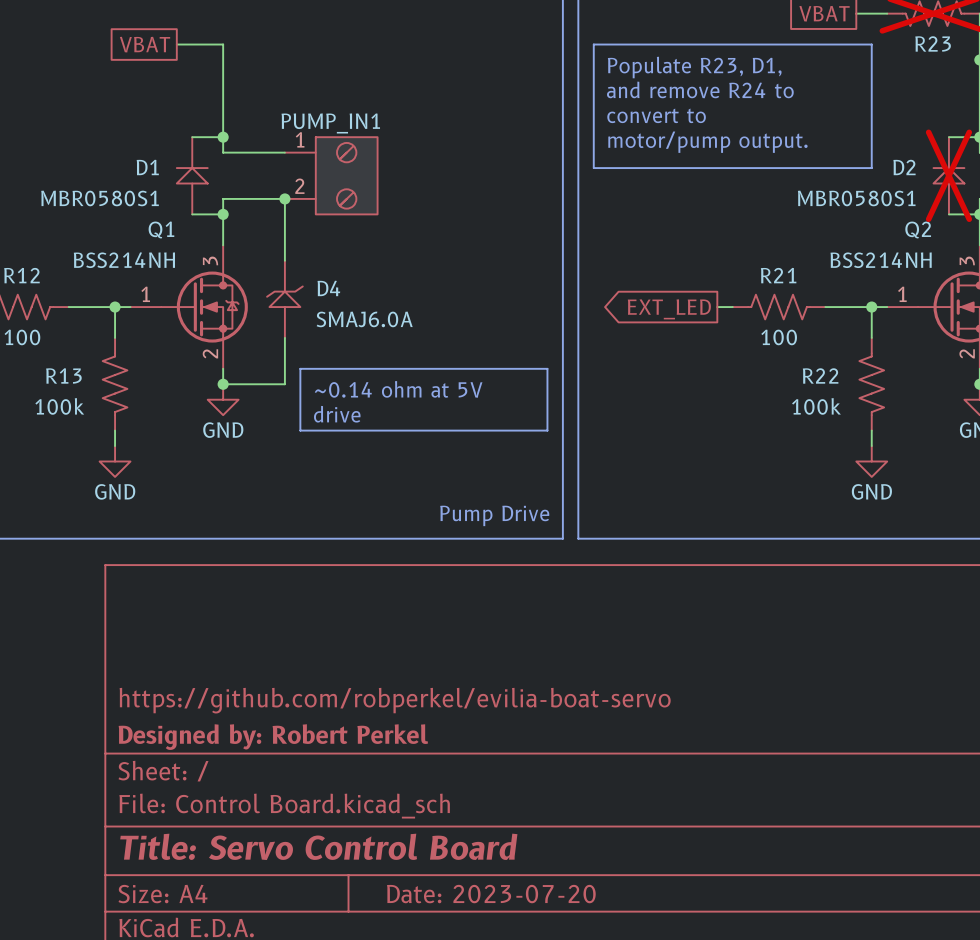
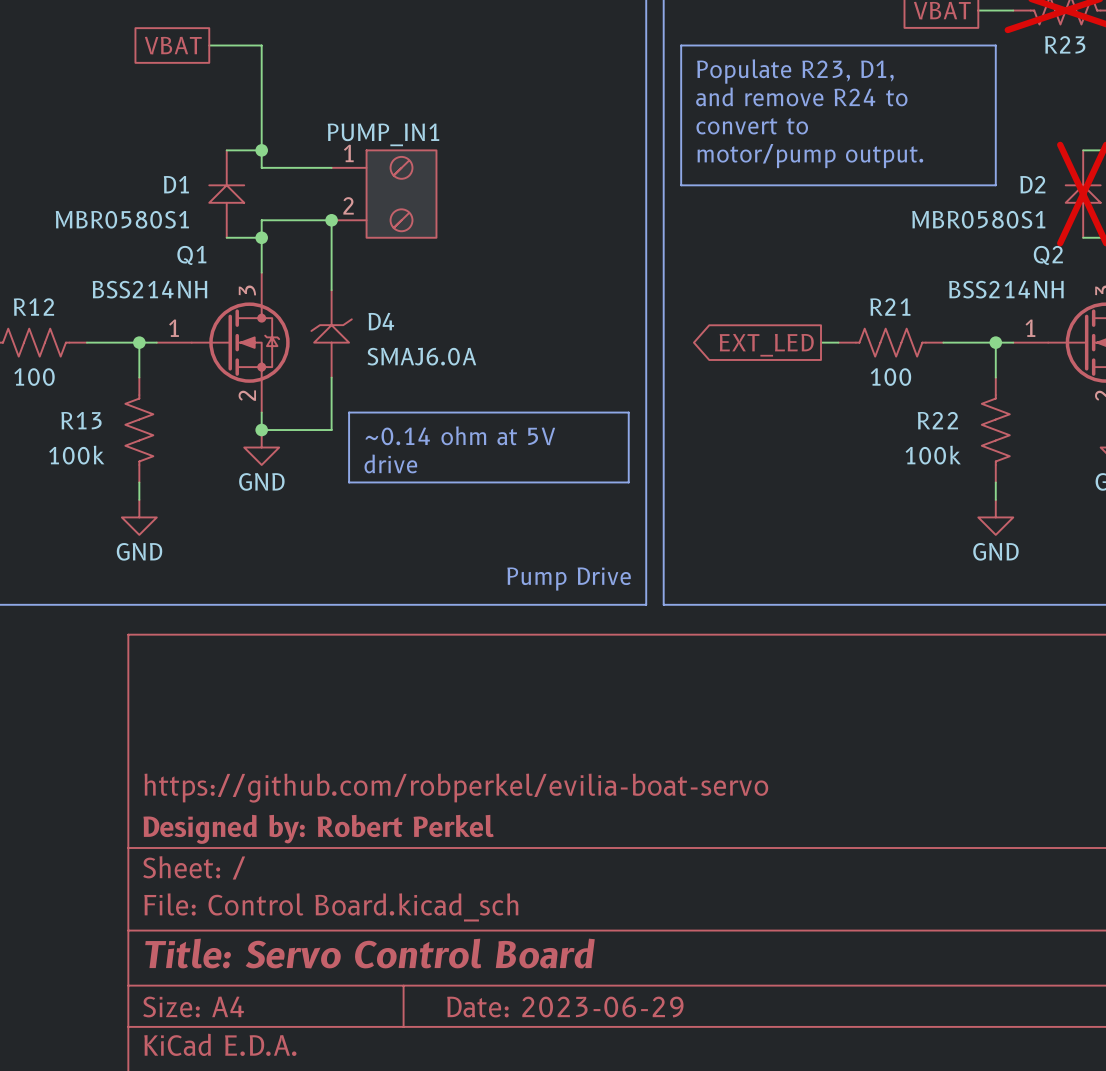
title block: Date: 2023-07-20 (491, 894) -> Date: 2023-06-29 (565, 1007)

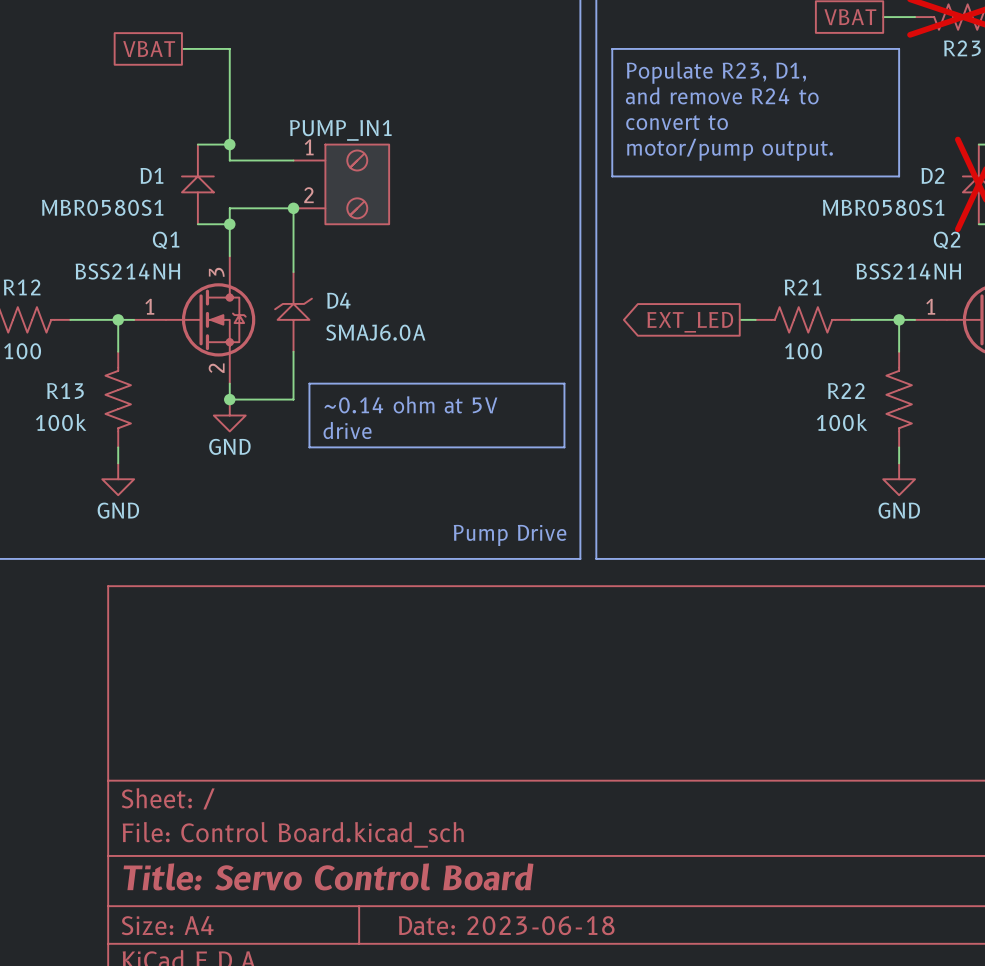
title block: https://github.com/robperkel/evilia-boat-servo (456, 788) -> none
title block: Designed by: Robert Perkel (318, 829) -> none
title block: Date: 2023-06-29 (565, 1007) -> Date: 2023-06-18 (506, 925)

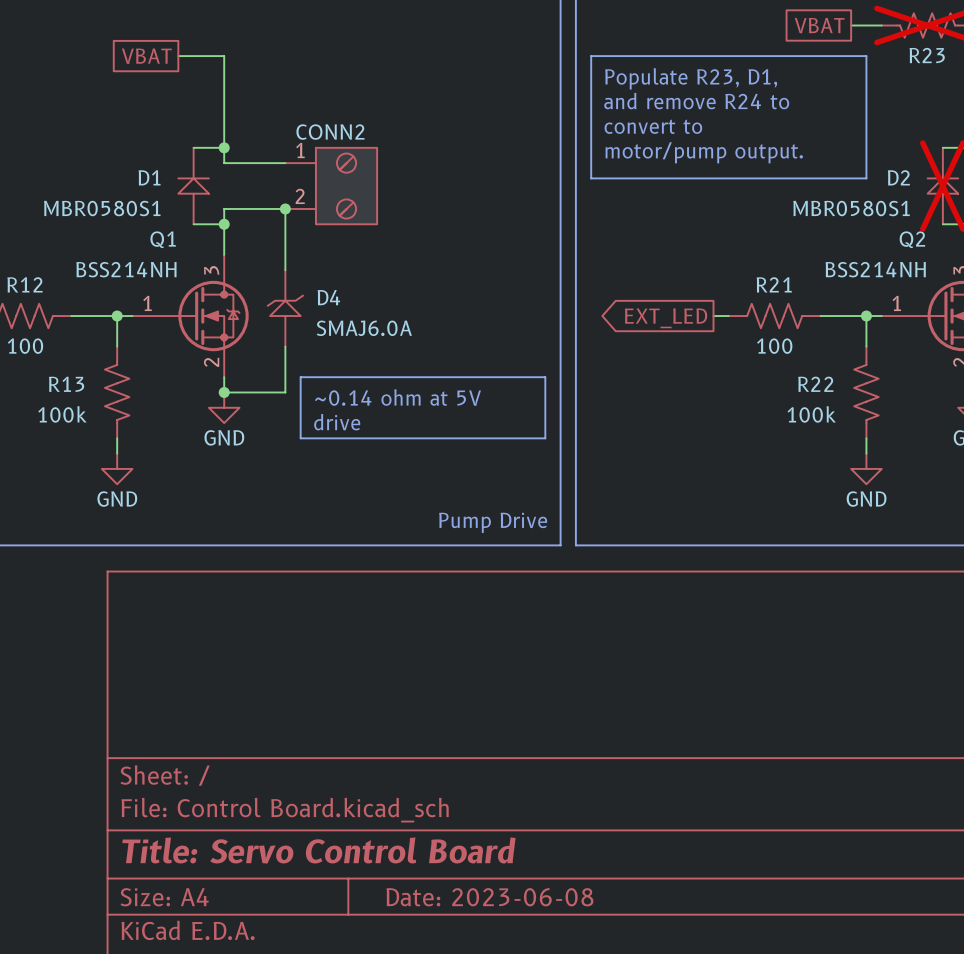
PUMP_IN1 name: PUMP_IN1 (340, 130) -> CONN2 (330, 132)
title block: Date: 2023-06-18 (506, 925) -> Date: 2023-06-08 (489, 897)

